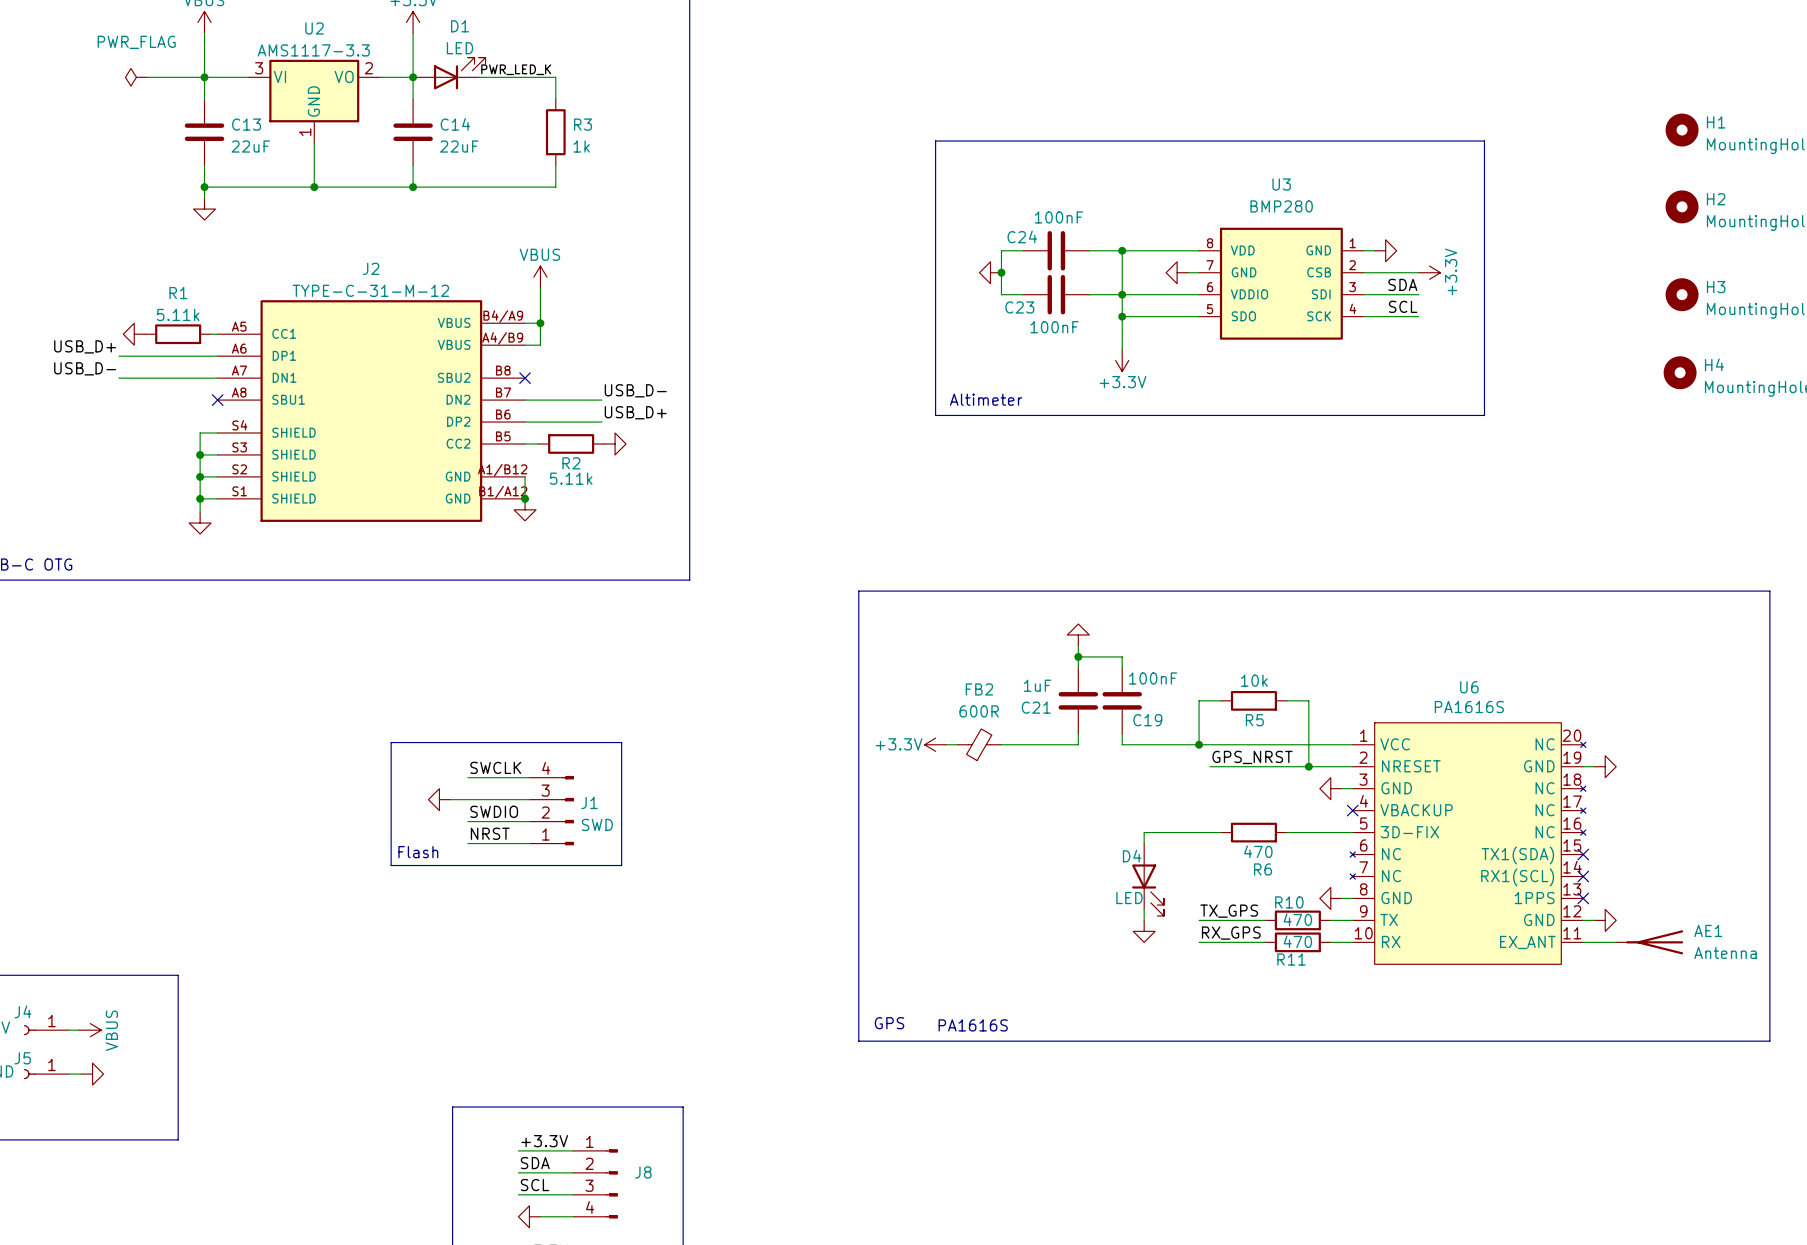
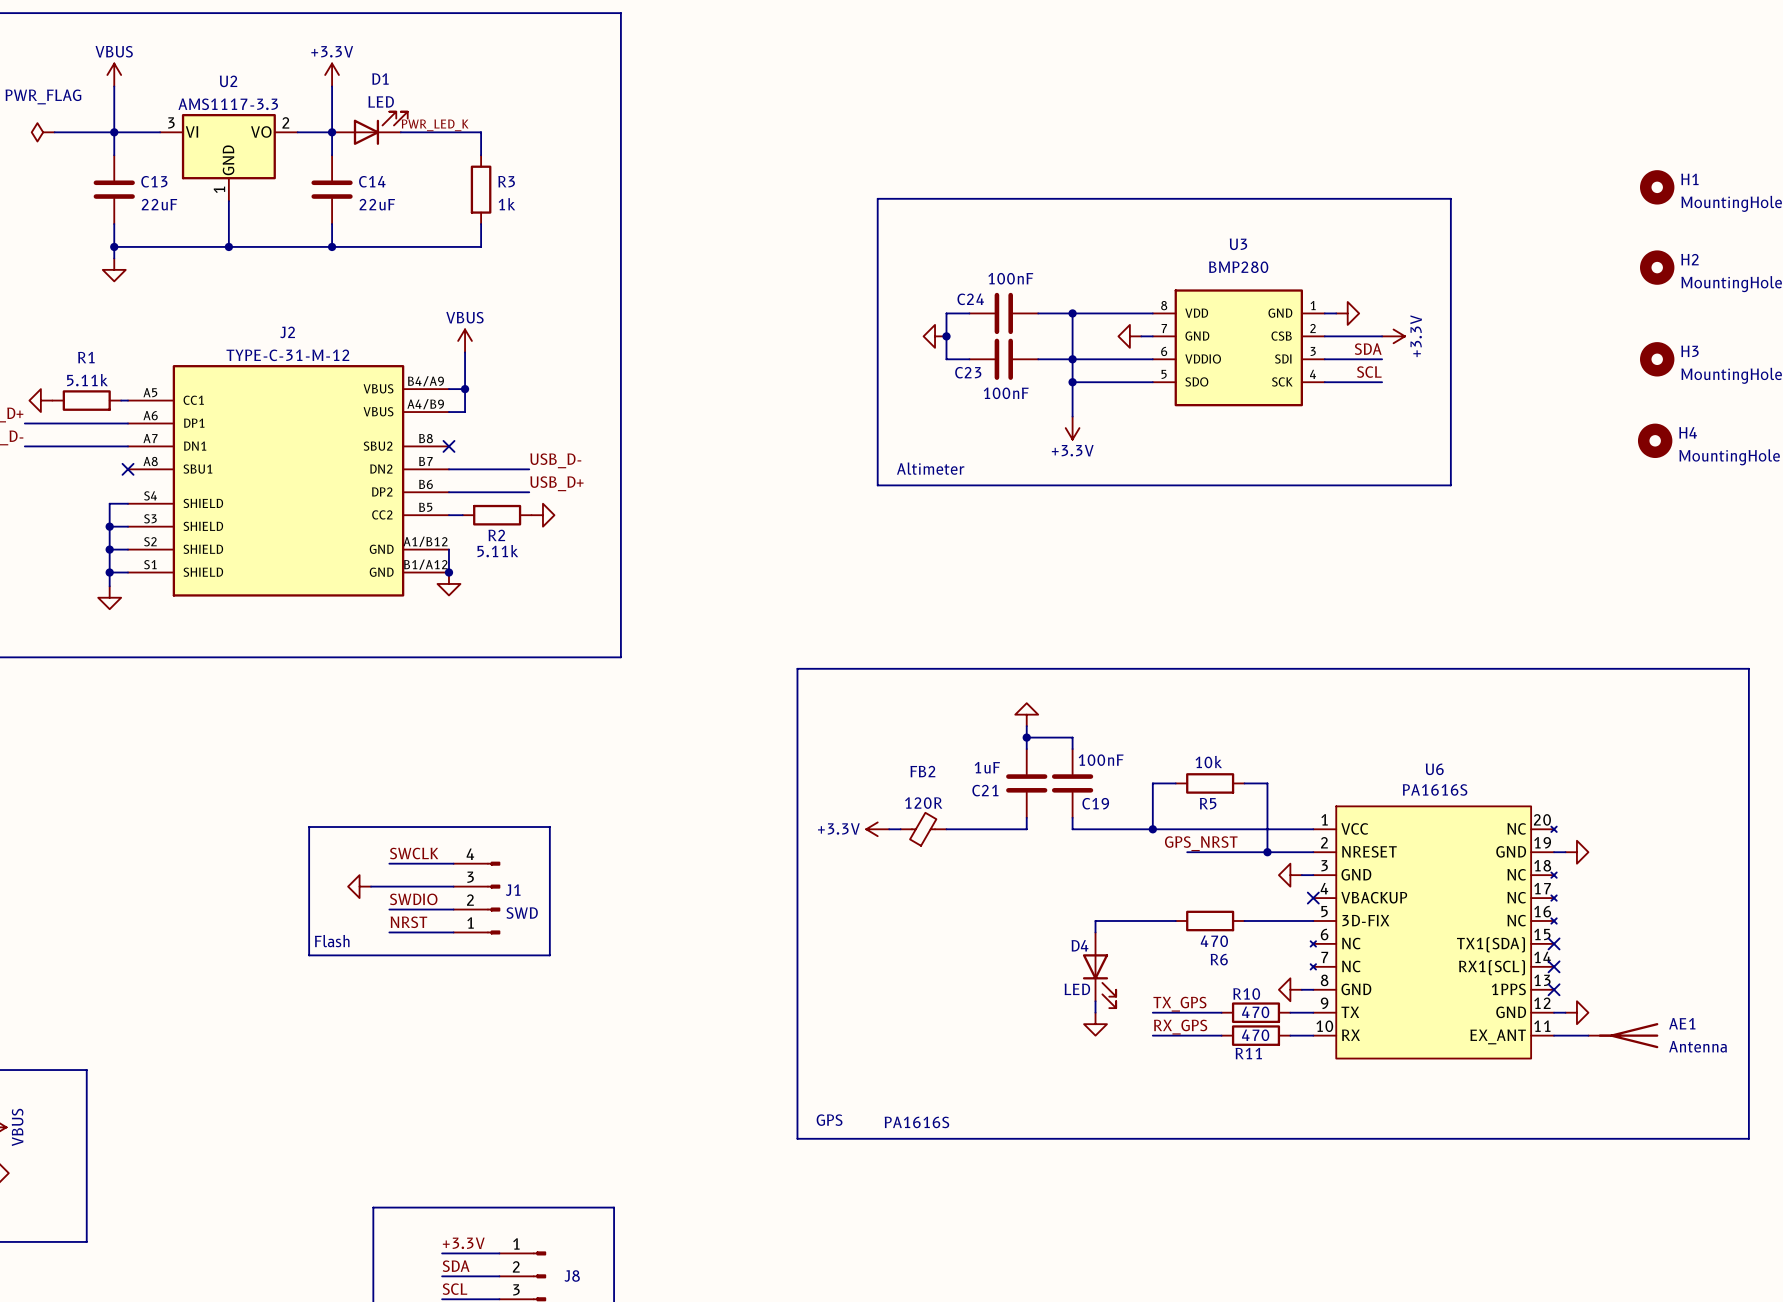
FB2 value: 600R (979, 711) -> 120R (923, 803)
wire: (1210, 766) (1231, 766) -> none

